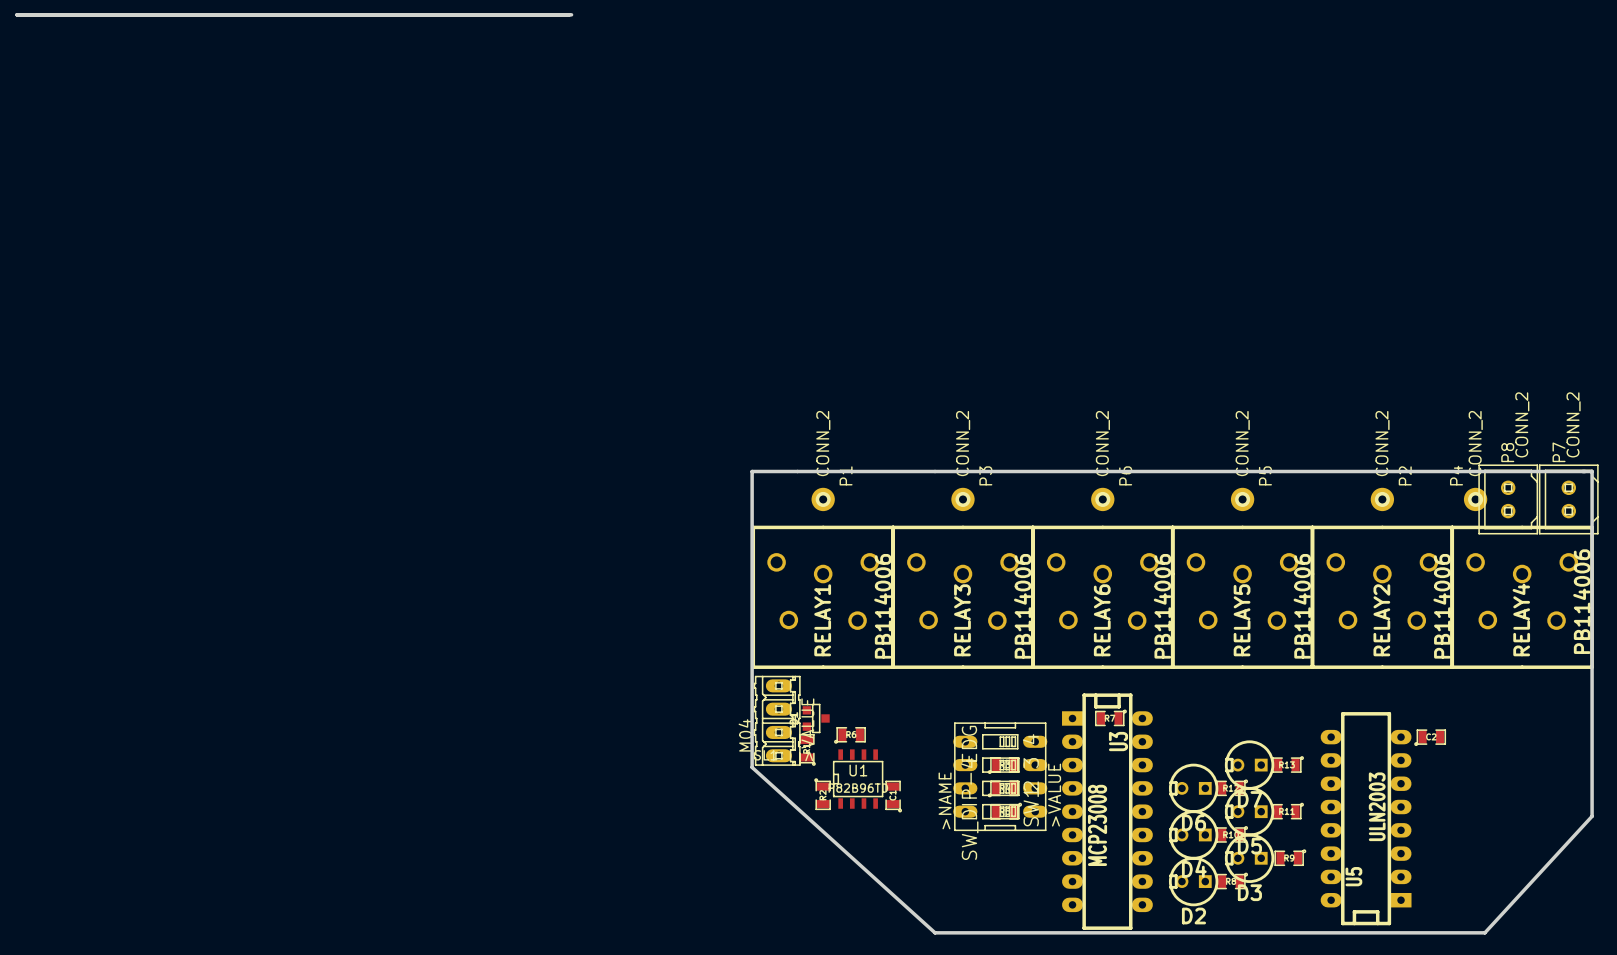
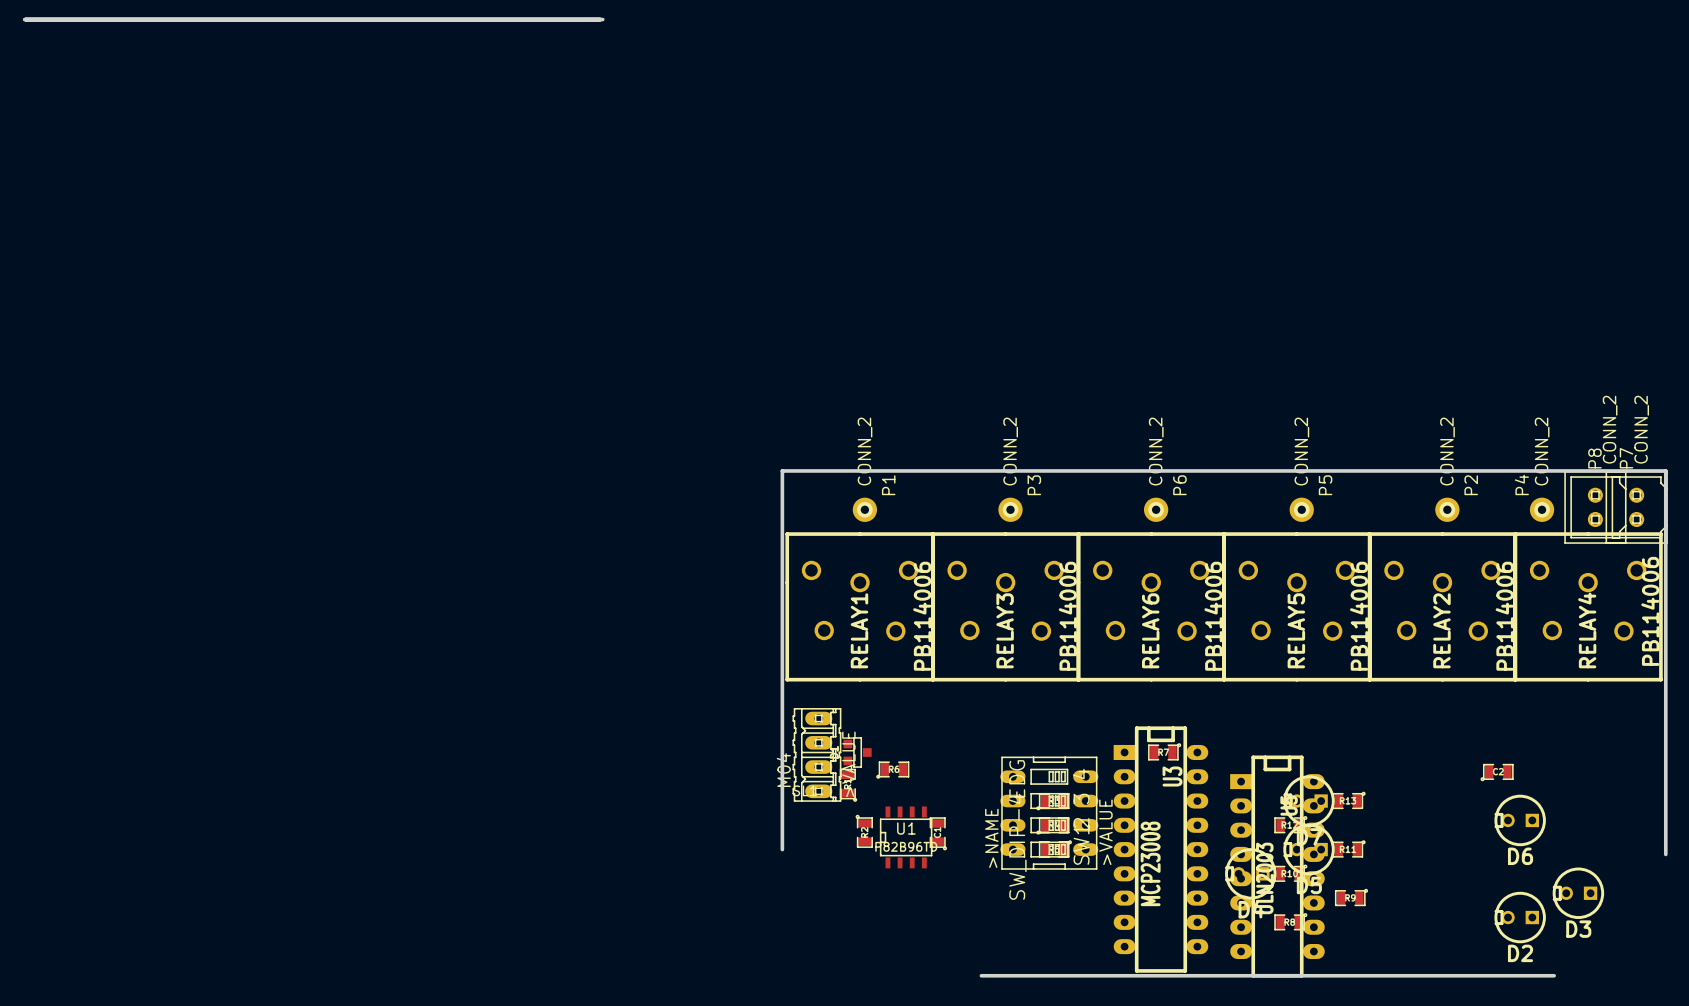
board edge: (1592, 471) (752, 471) (752, 767) (935, 932) -> (1665, 495) (1665, 470) (782, 470) (782, 849)
P1 position: (823, 499) -> (864, 509)
P3 position: (962, 499) -> (1010, 509)
P6 position: (1102, 499) -> (1156, 509)
P5 position: (1242, 499) -> (1301, 509)
P2 position: (1382, 499) -> (1447, 509)
P4 position: (1475, 499) -> (1542, 509)
P8 position: (1508, 499) -> (1595, 507)
P7 position: (1568, 499) -> (1636, 507)
RELAY1 position: (823, 597) -> (860, 606)
RELAY3 position: (962, 597) -> (1005, 606)
RELAY6 position: (1102, 597) -> (1151, 606)
RELAY5 position: (1242, 597) -> (1296, 606)
RELAY2 position: (1382, 597) -> (1442, 606)
RELAY4 position: (1522, 597) -> (1588, 606)
U1 position: (858, 779) -> (906, 837)
D6 position: (1193, 788) -> (1520, 820)
board edge: (1592, 816) (1484, 932) -> none
U5 rotation: 0° (1366, 818) -> 180° (1277, 866)
U5 position: (1366, 818) -> (1277, 866)
D3 position: (1249, 858) -> (1578, 893)
D2 position: (1193, 881) -> (1520, 917)

